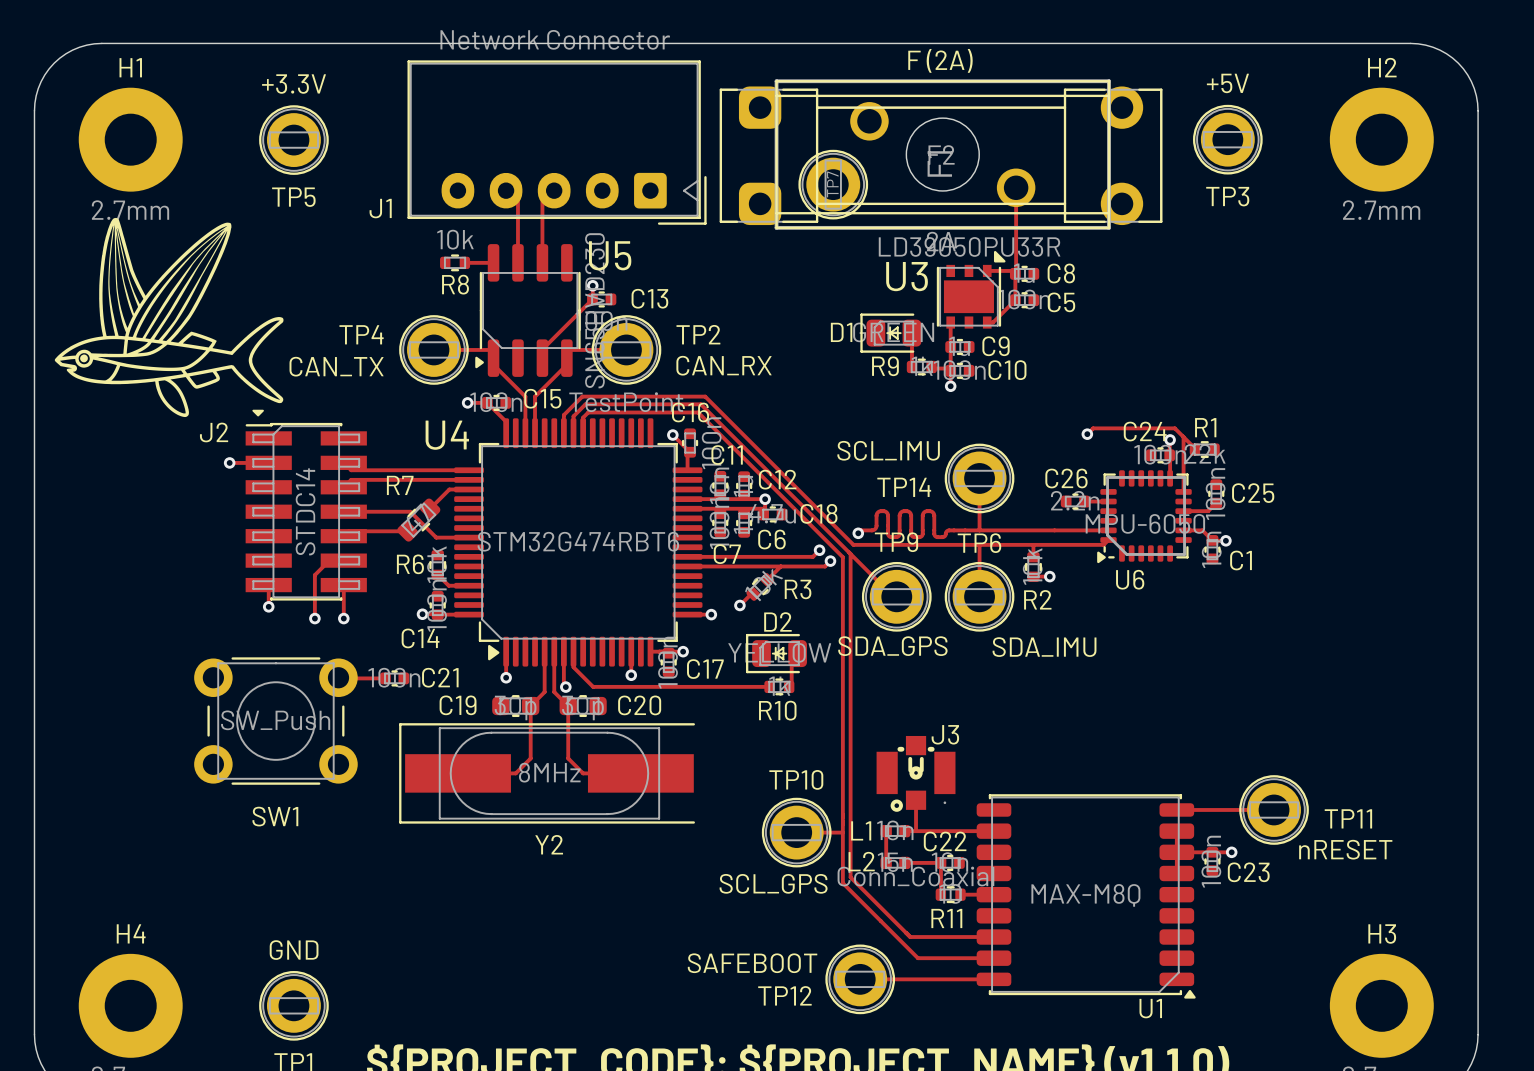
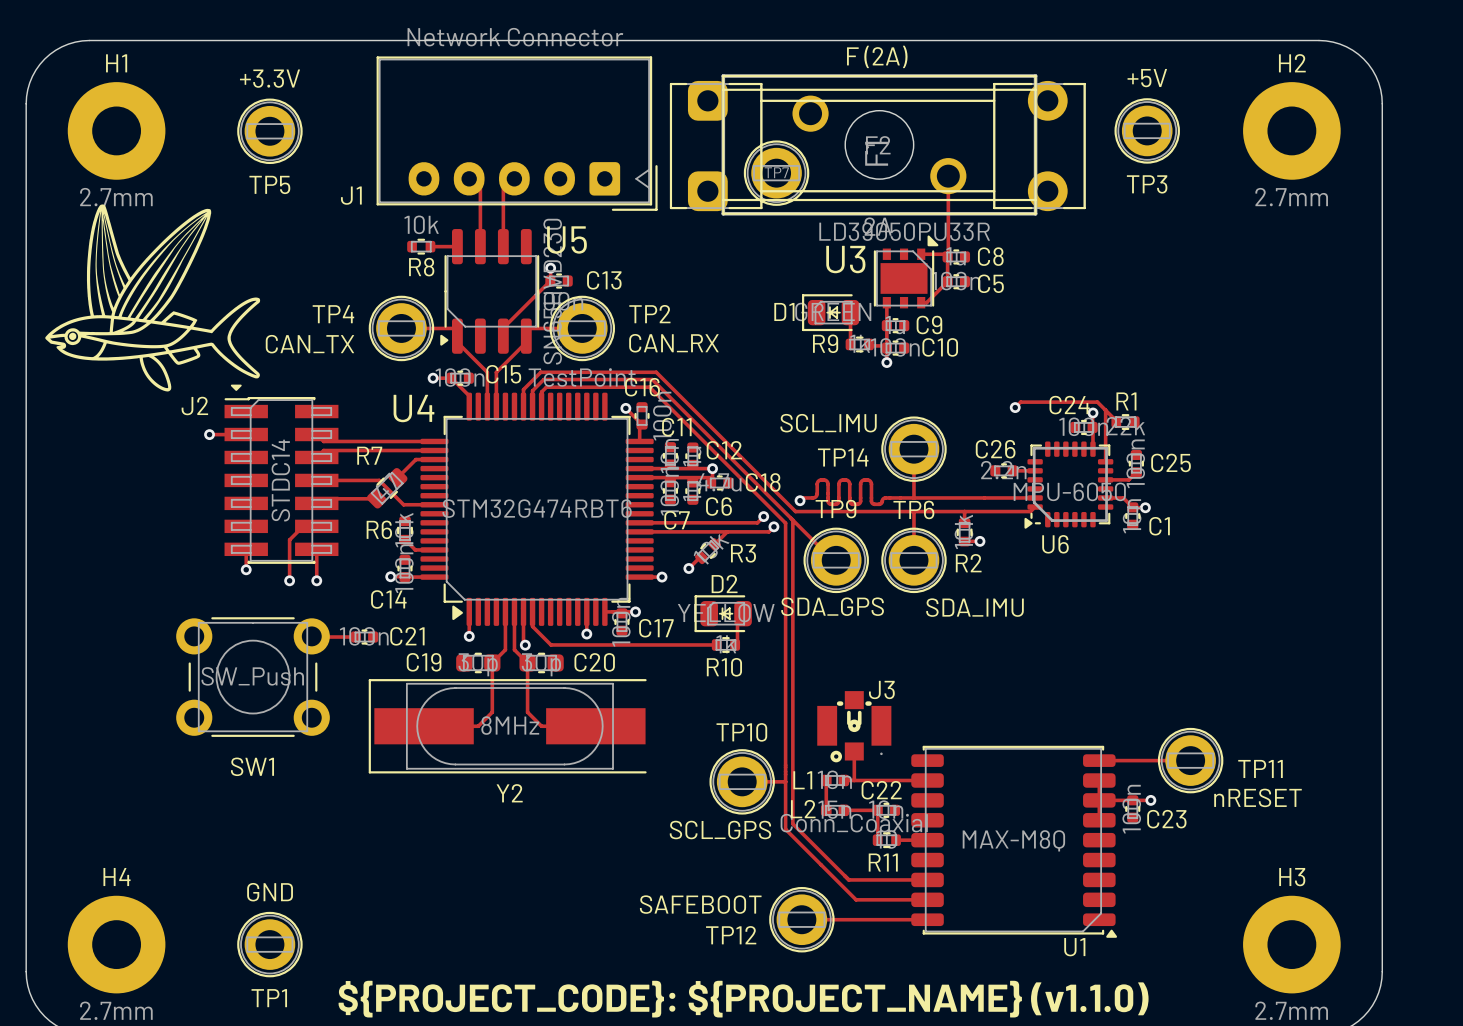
TP7 rotation: 0° (833, 184) -> 90° clockwise (776, 173)

